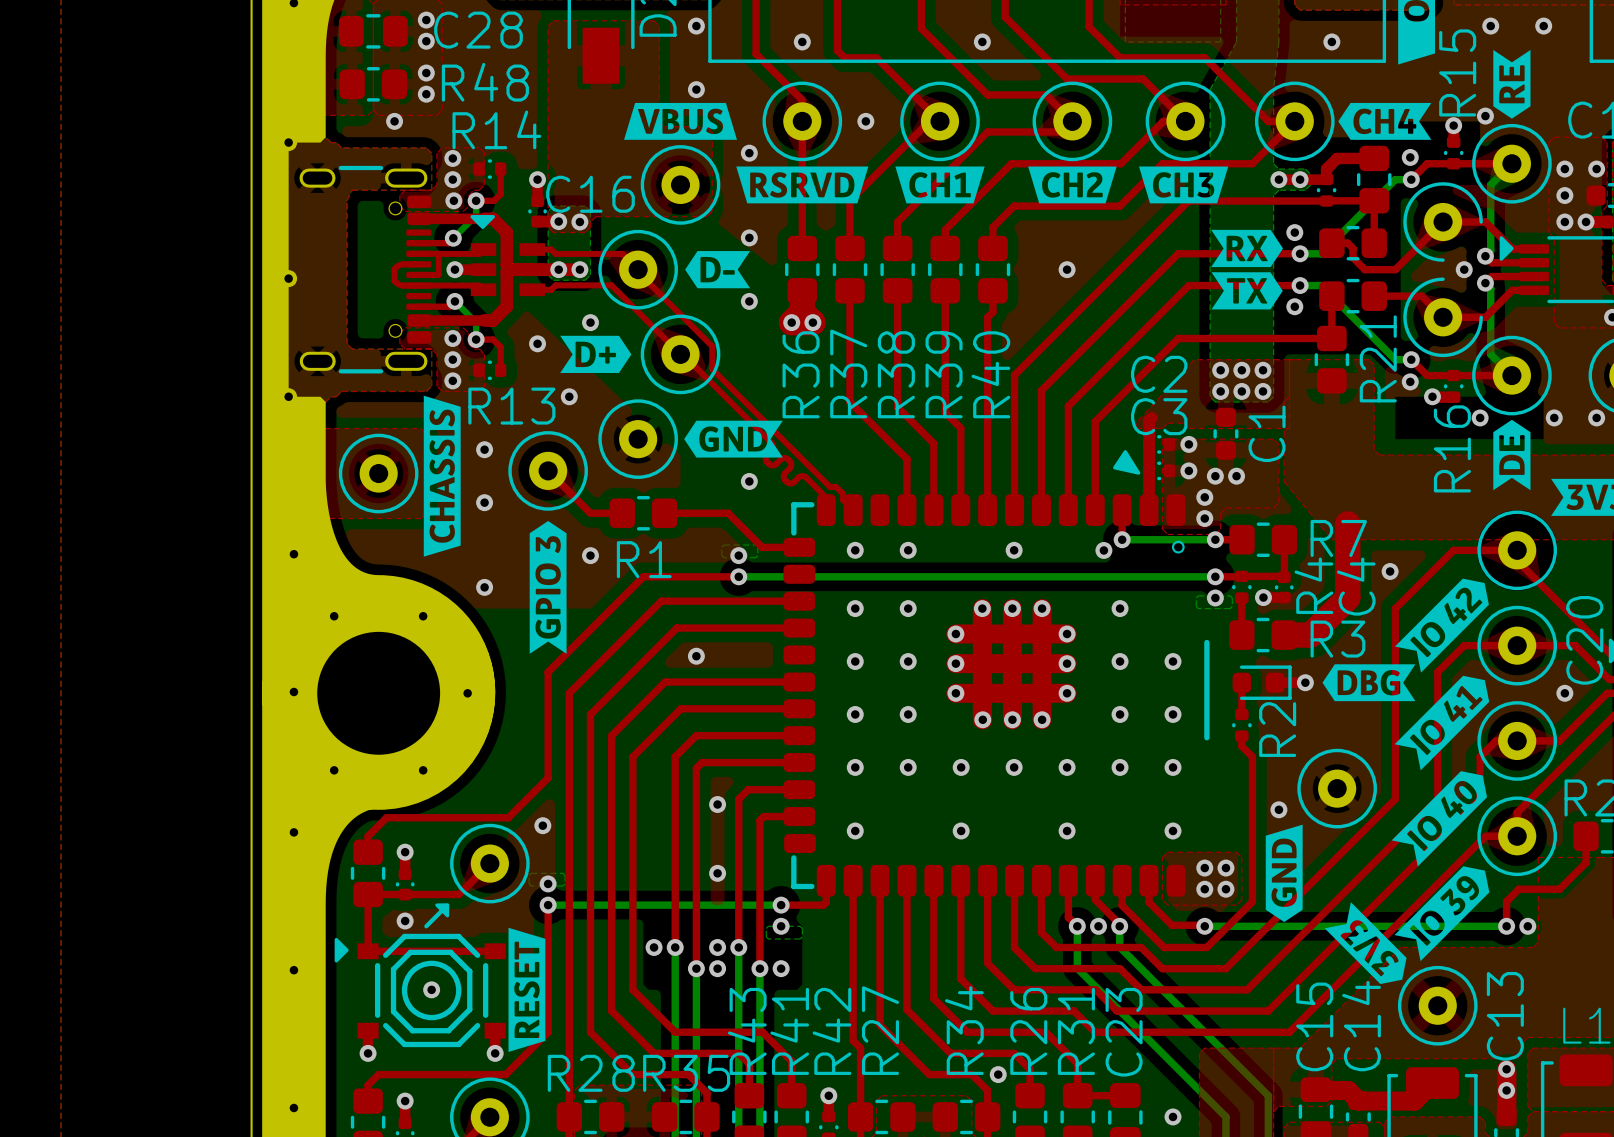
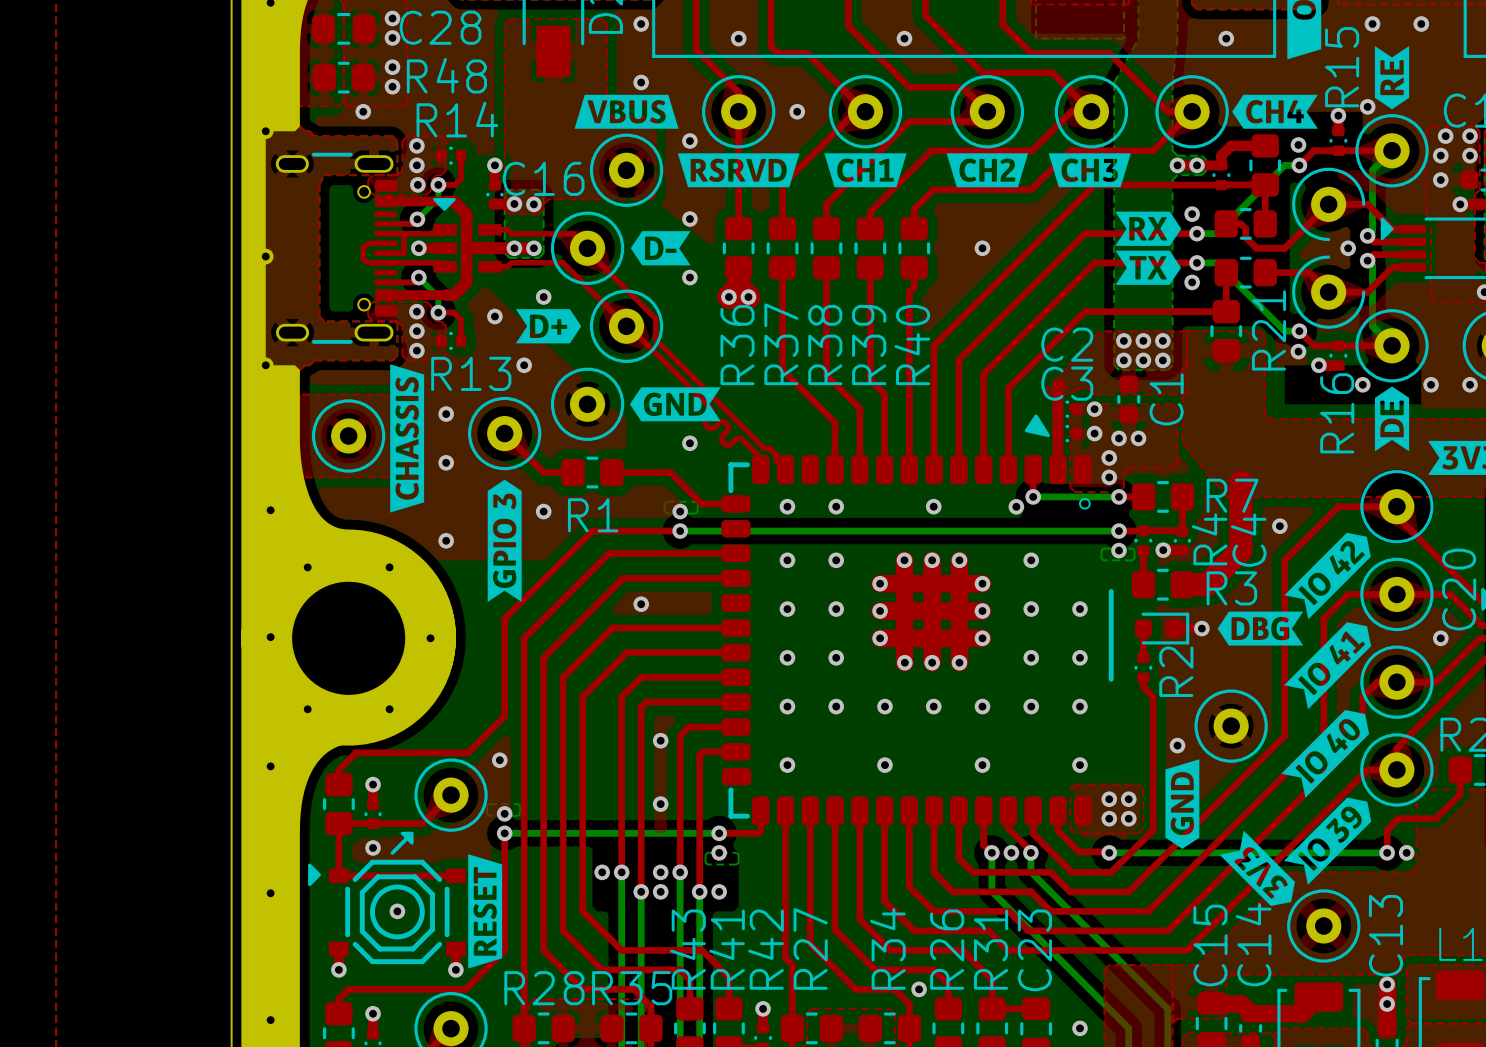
via: none -> (1445, 136)
via: none -> (1470, 136)
via: (1564, 222) -> none

